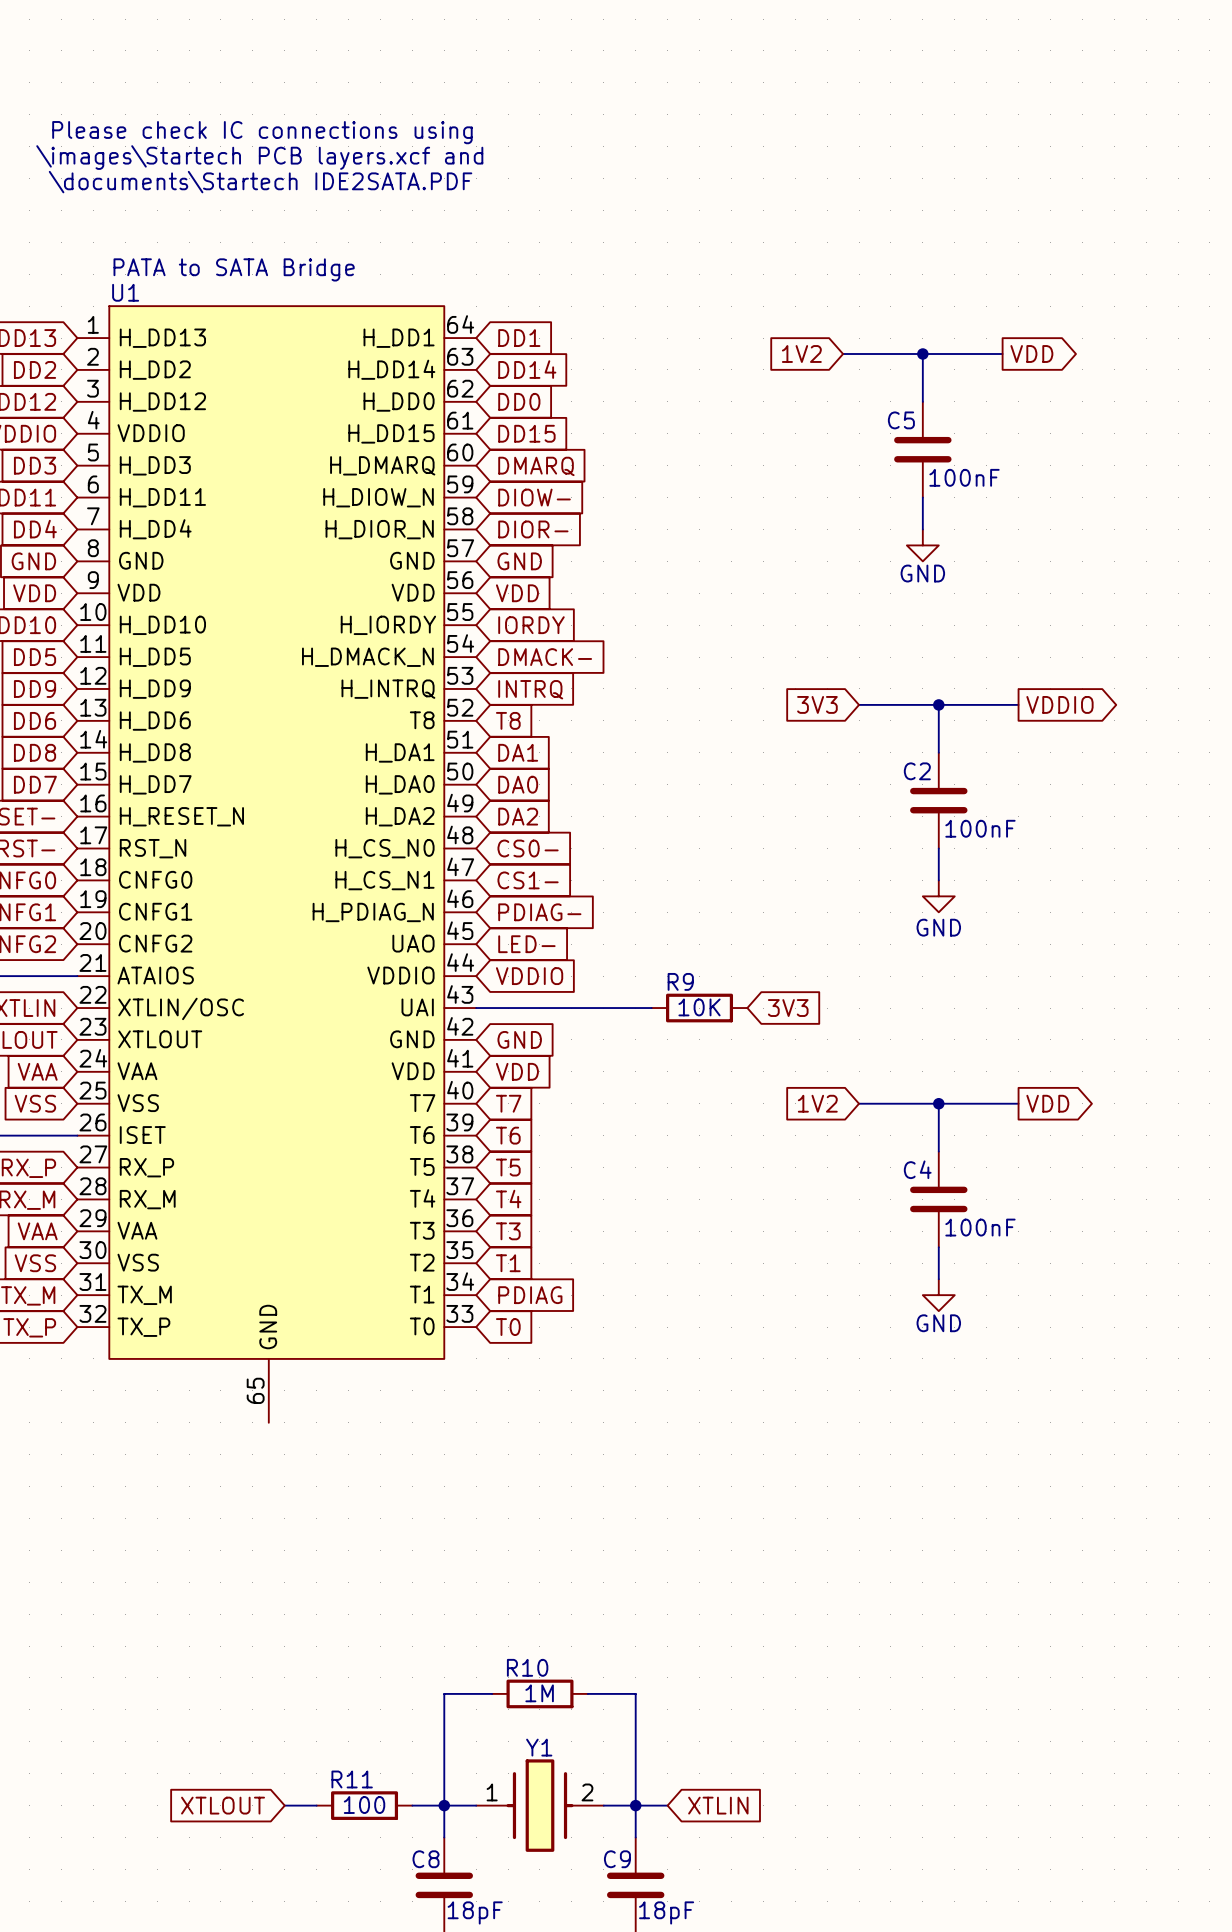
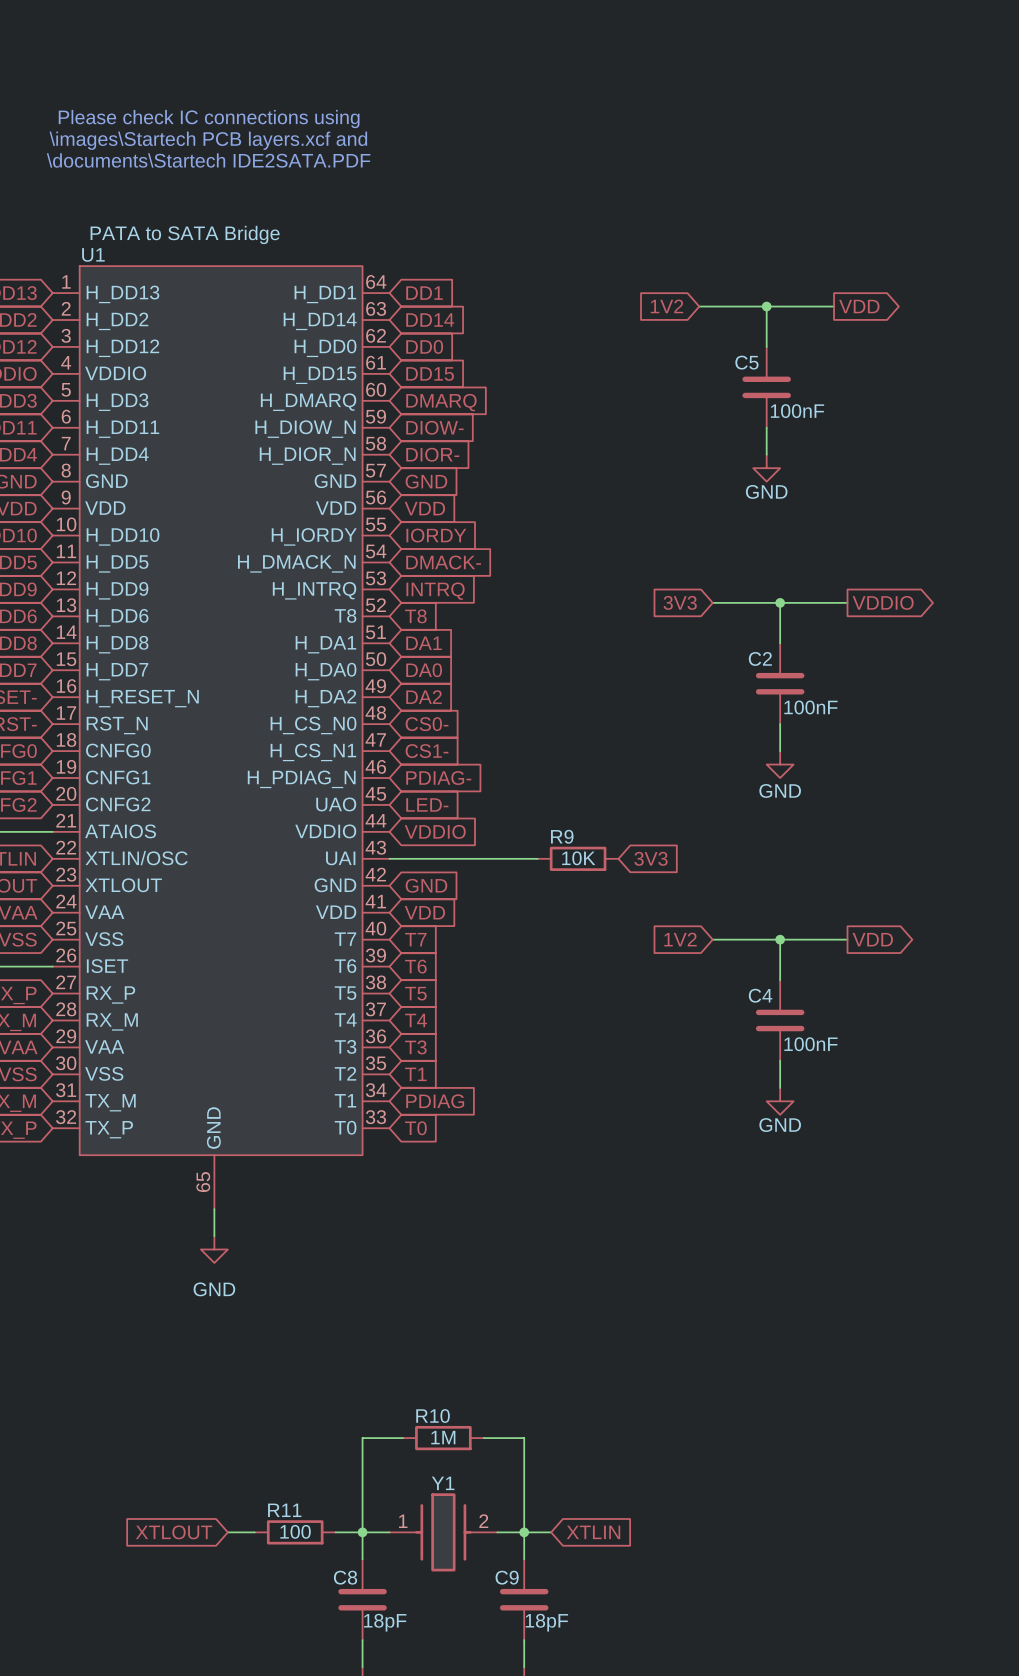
wire: none -> (214, 1209) (214, 1236)
power symbol: none -> GND (214, 1249)

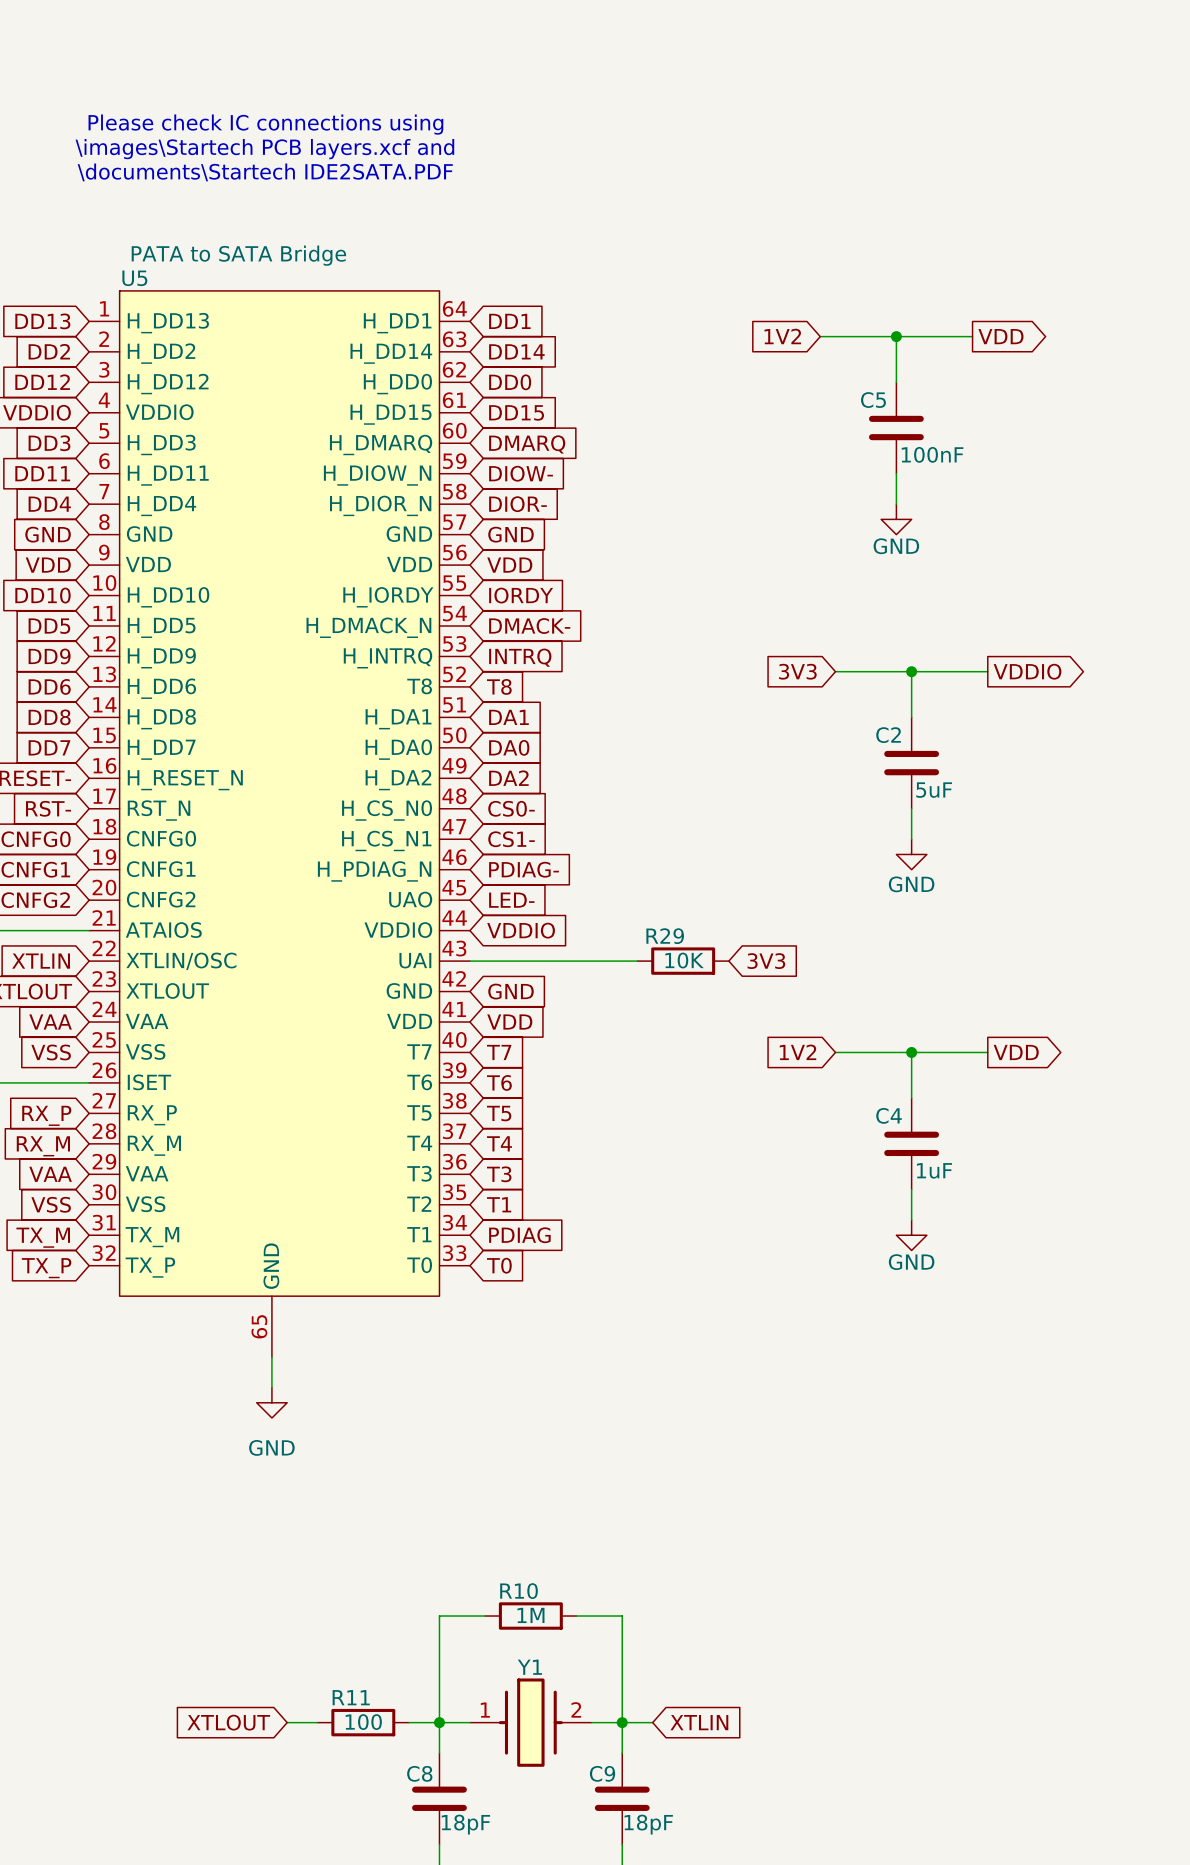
U1 name: U1 (93, 254) -> U5 (134, 278)
C2 value: 100nF (810, 707) -> 5uF (934, 790)
R9 name: R9 (562, 836) -> R29 (665, 936)
C4 value: 100nF (810, 1044) -> 1uF (934, 1170)

